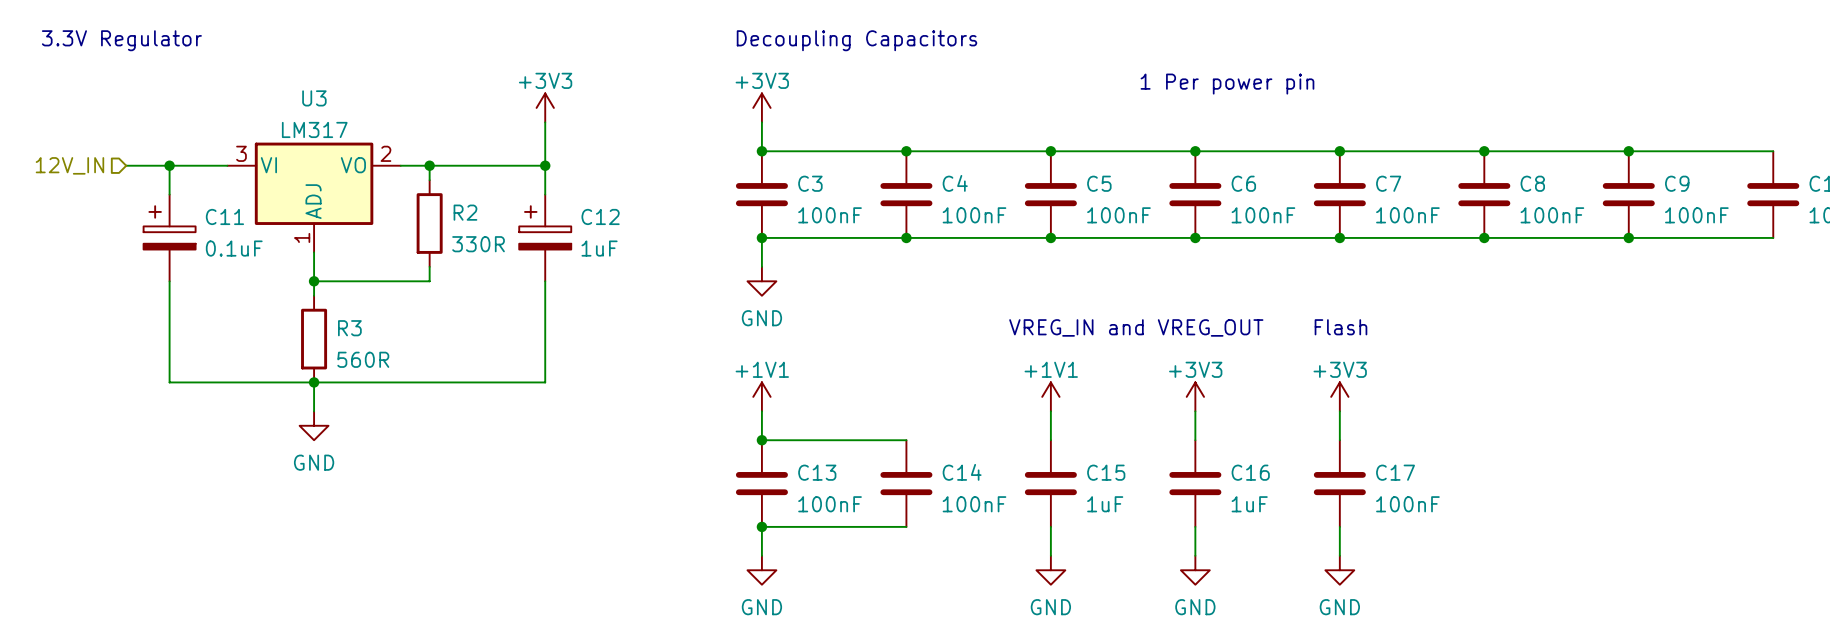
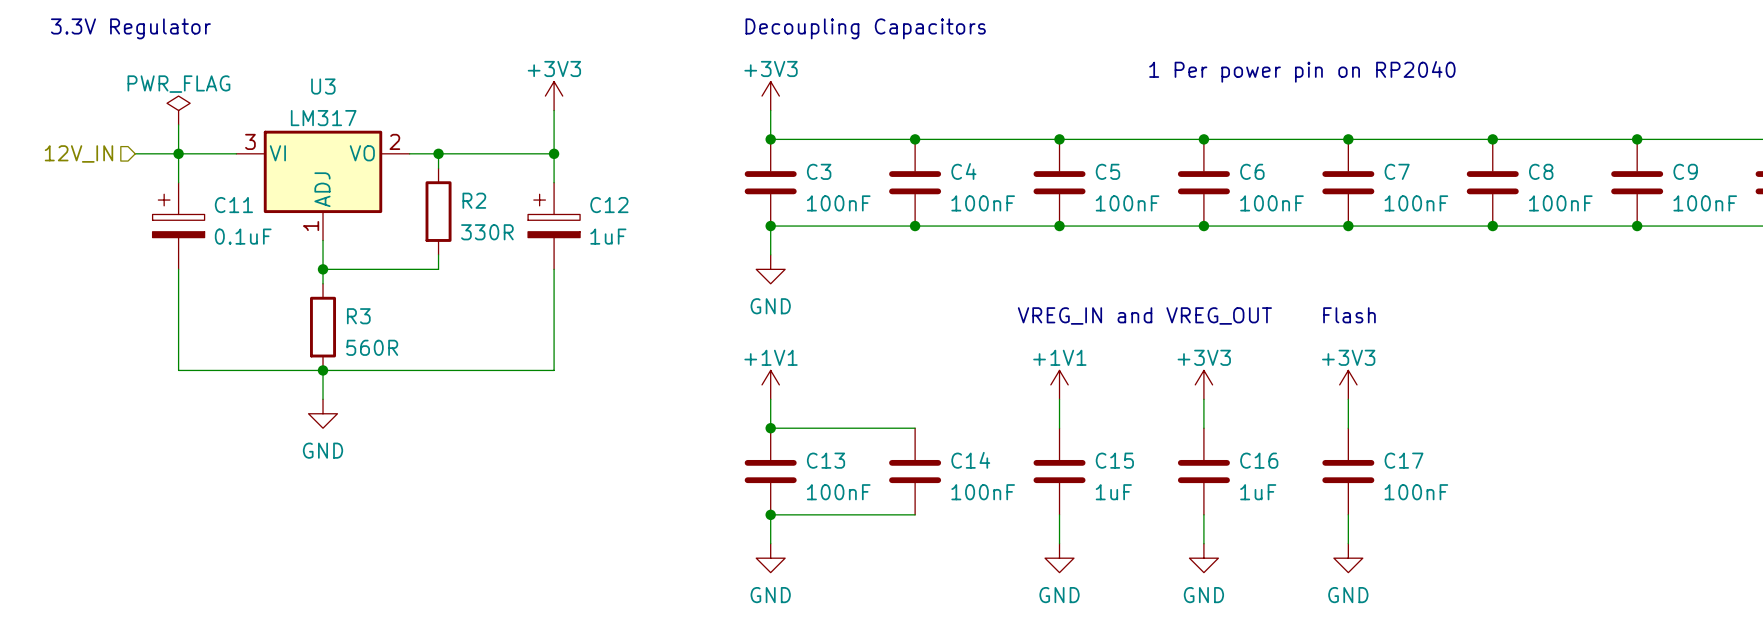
text: 1 Per power pin (1227, 84) -> 1 Per power pin on RP2040 (1302, 71)
power symbol: none -> PWR_FLAG (178, 110)
wire: none -> (178, 124) (178, 153)

